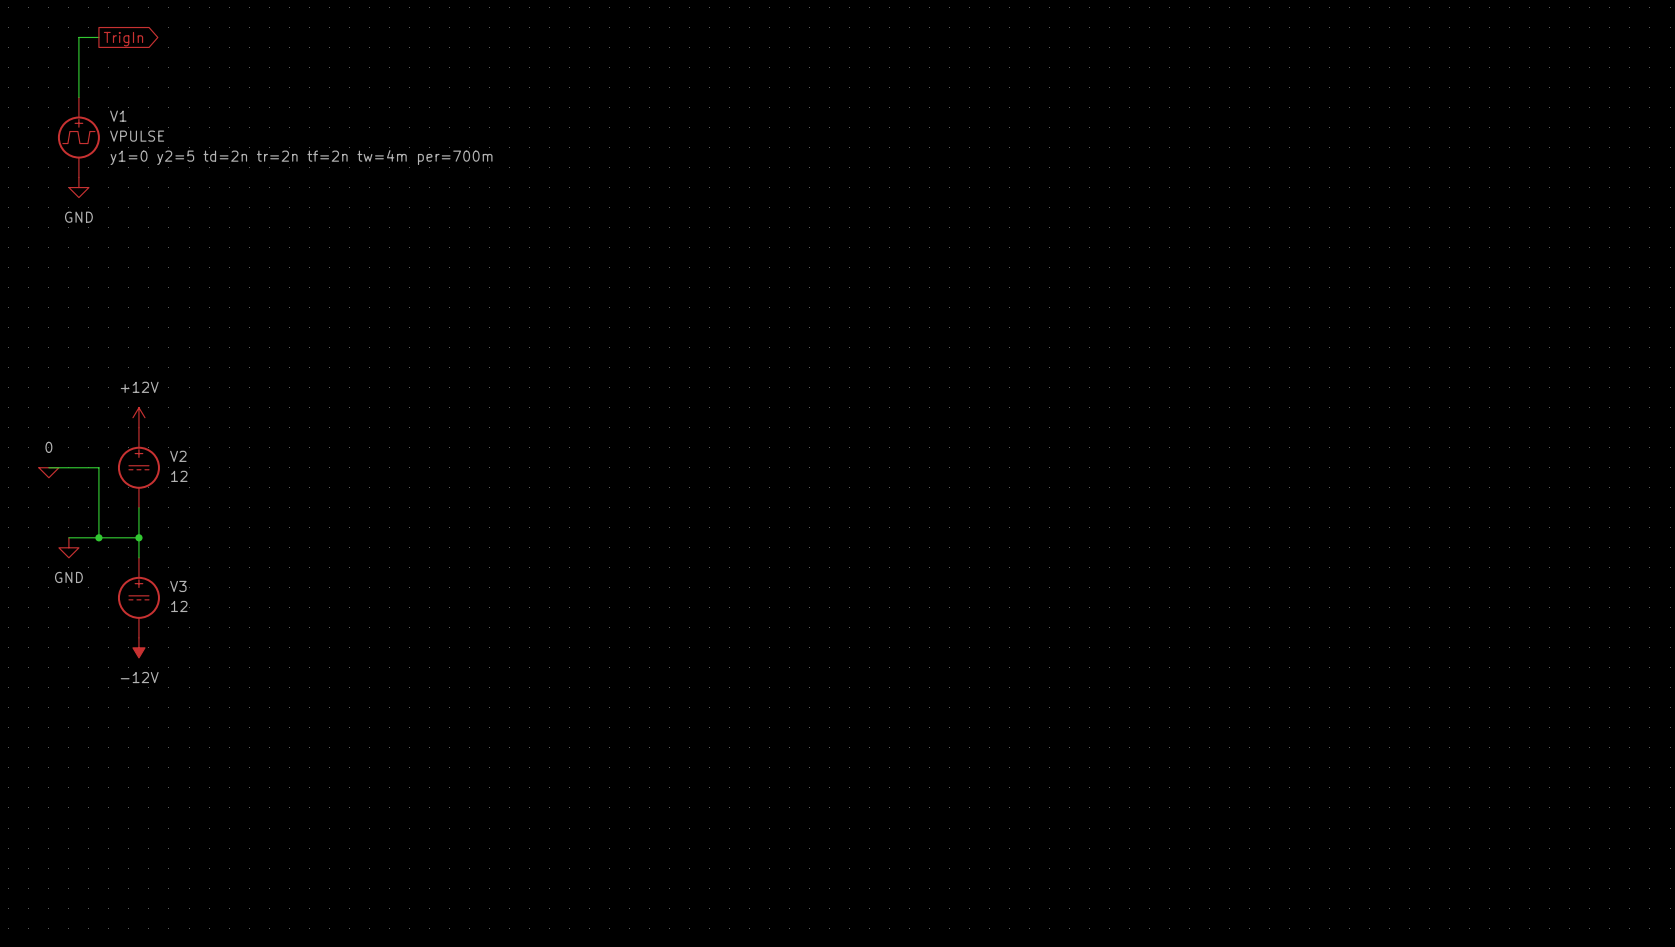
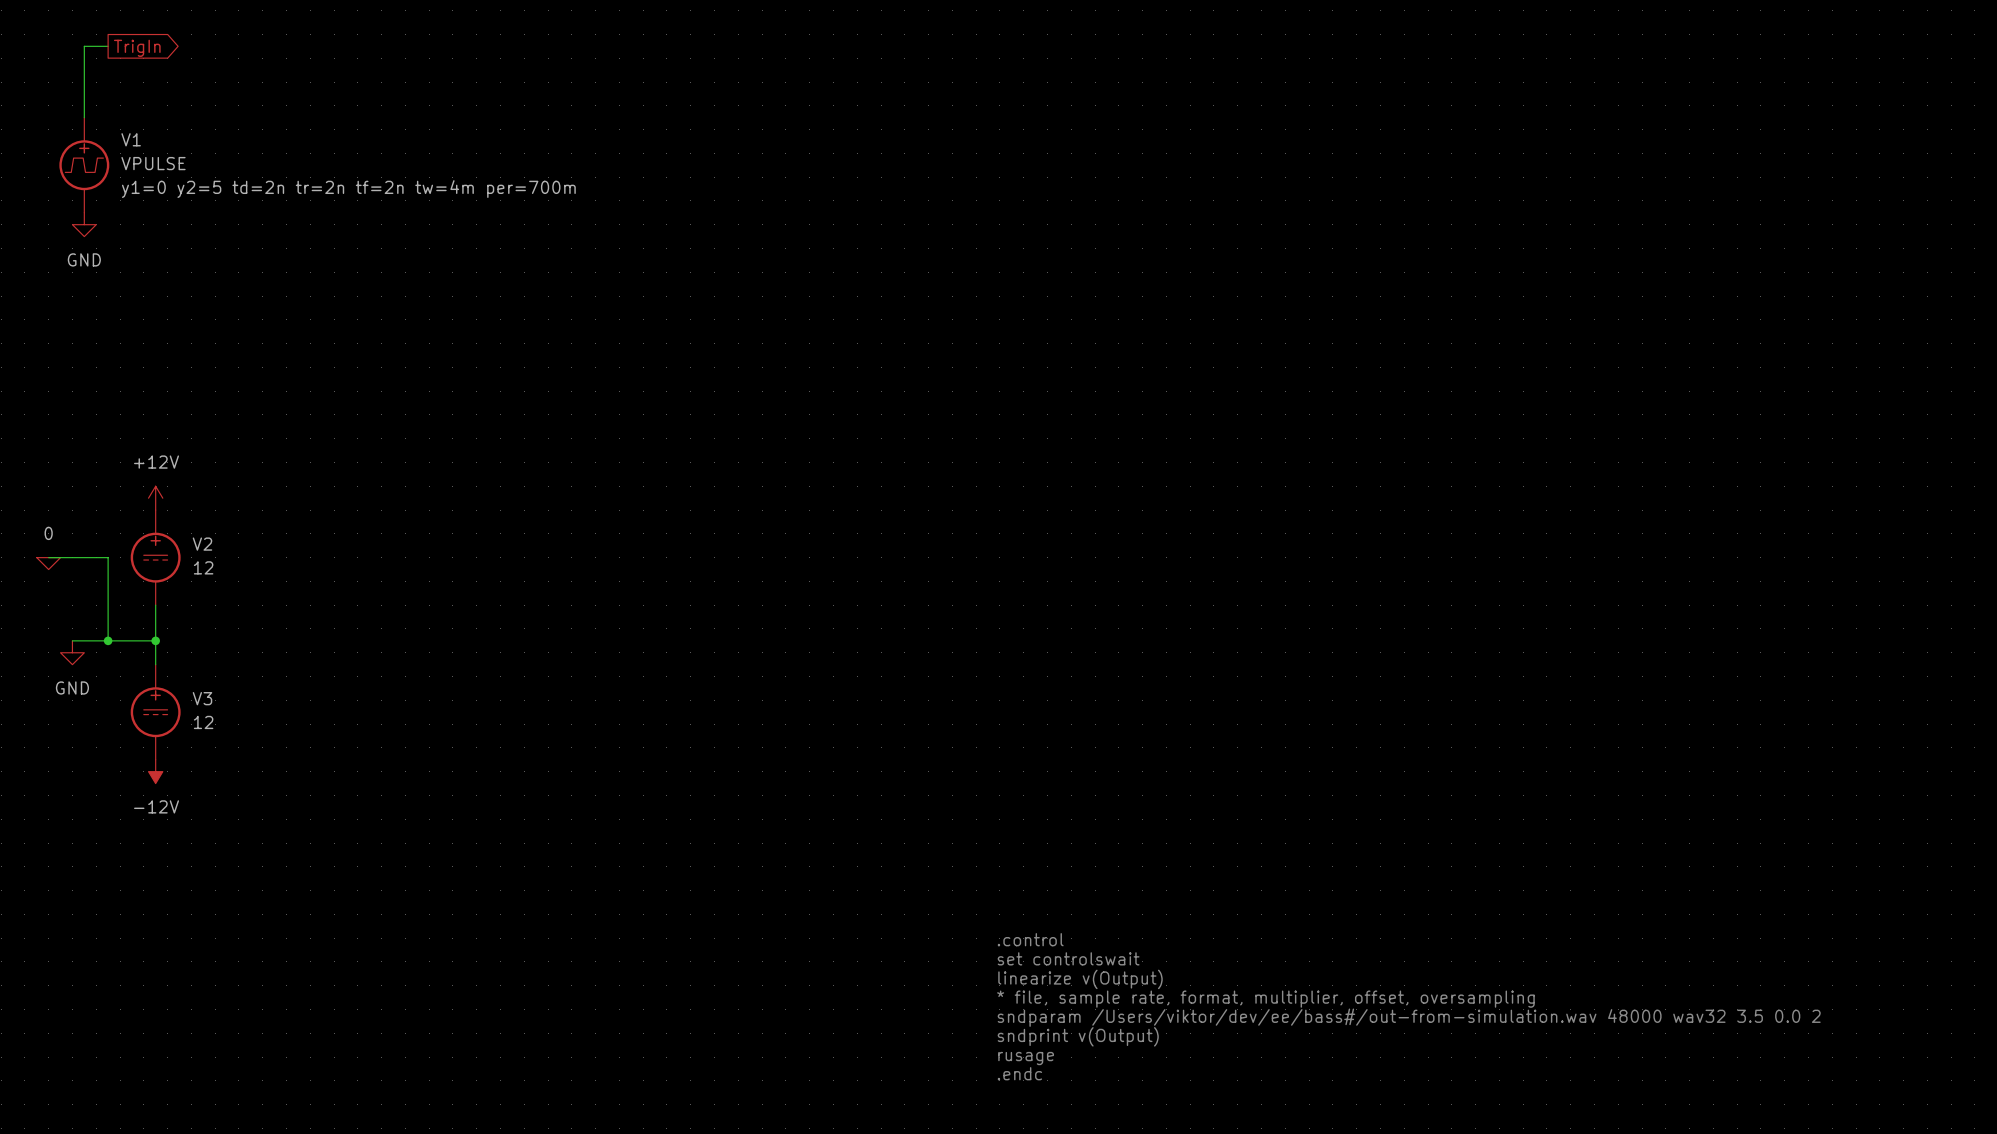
text: none -> .control (1030, 939)
text: none -> set controlswait (1068, 958)
text: none -> linearize v(Output) (1080, 979)
text: none -> * file, sample rate, format, multiplier, offset, oversampling (1265, 999)
text: none -> sndparam /Users/viktor/dev/ee/bass#/out-from-simulation.wav 48000 wav32 3.5 0.0 2 (1409, 1017)
text: none -> sndprint v(Output) (1078, 1036)
text: none -> rusage (1026, 1058)
text: none -> .endc (1019, 1073)

